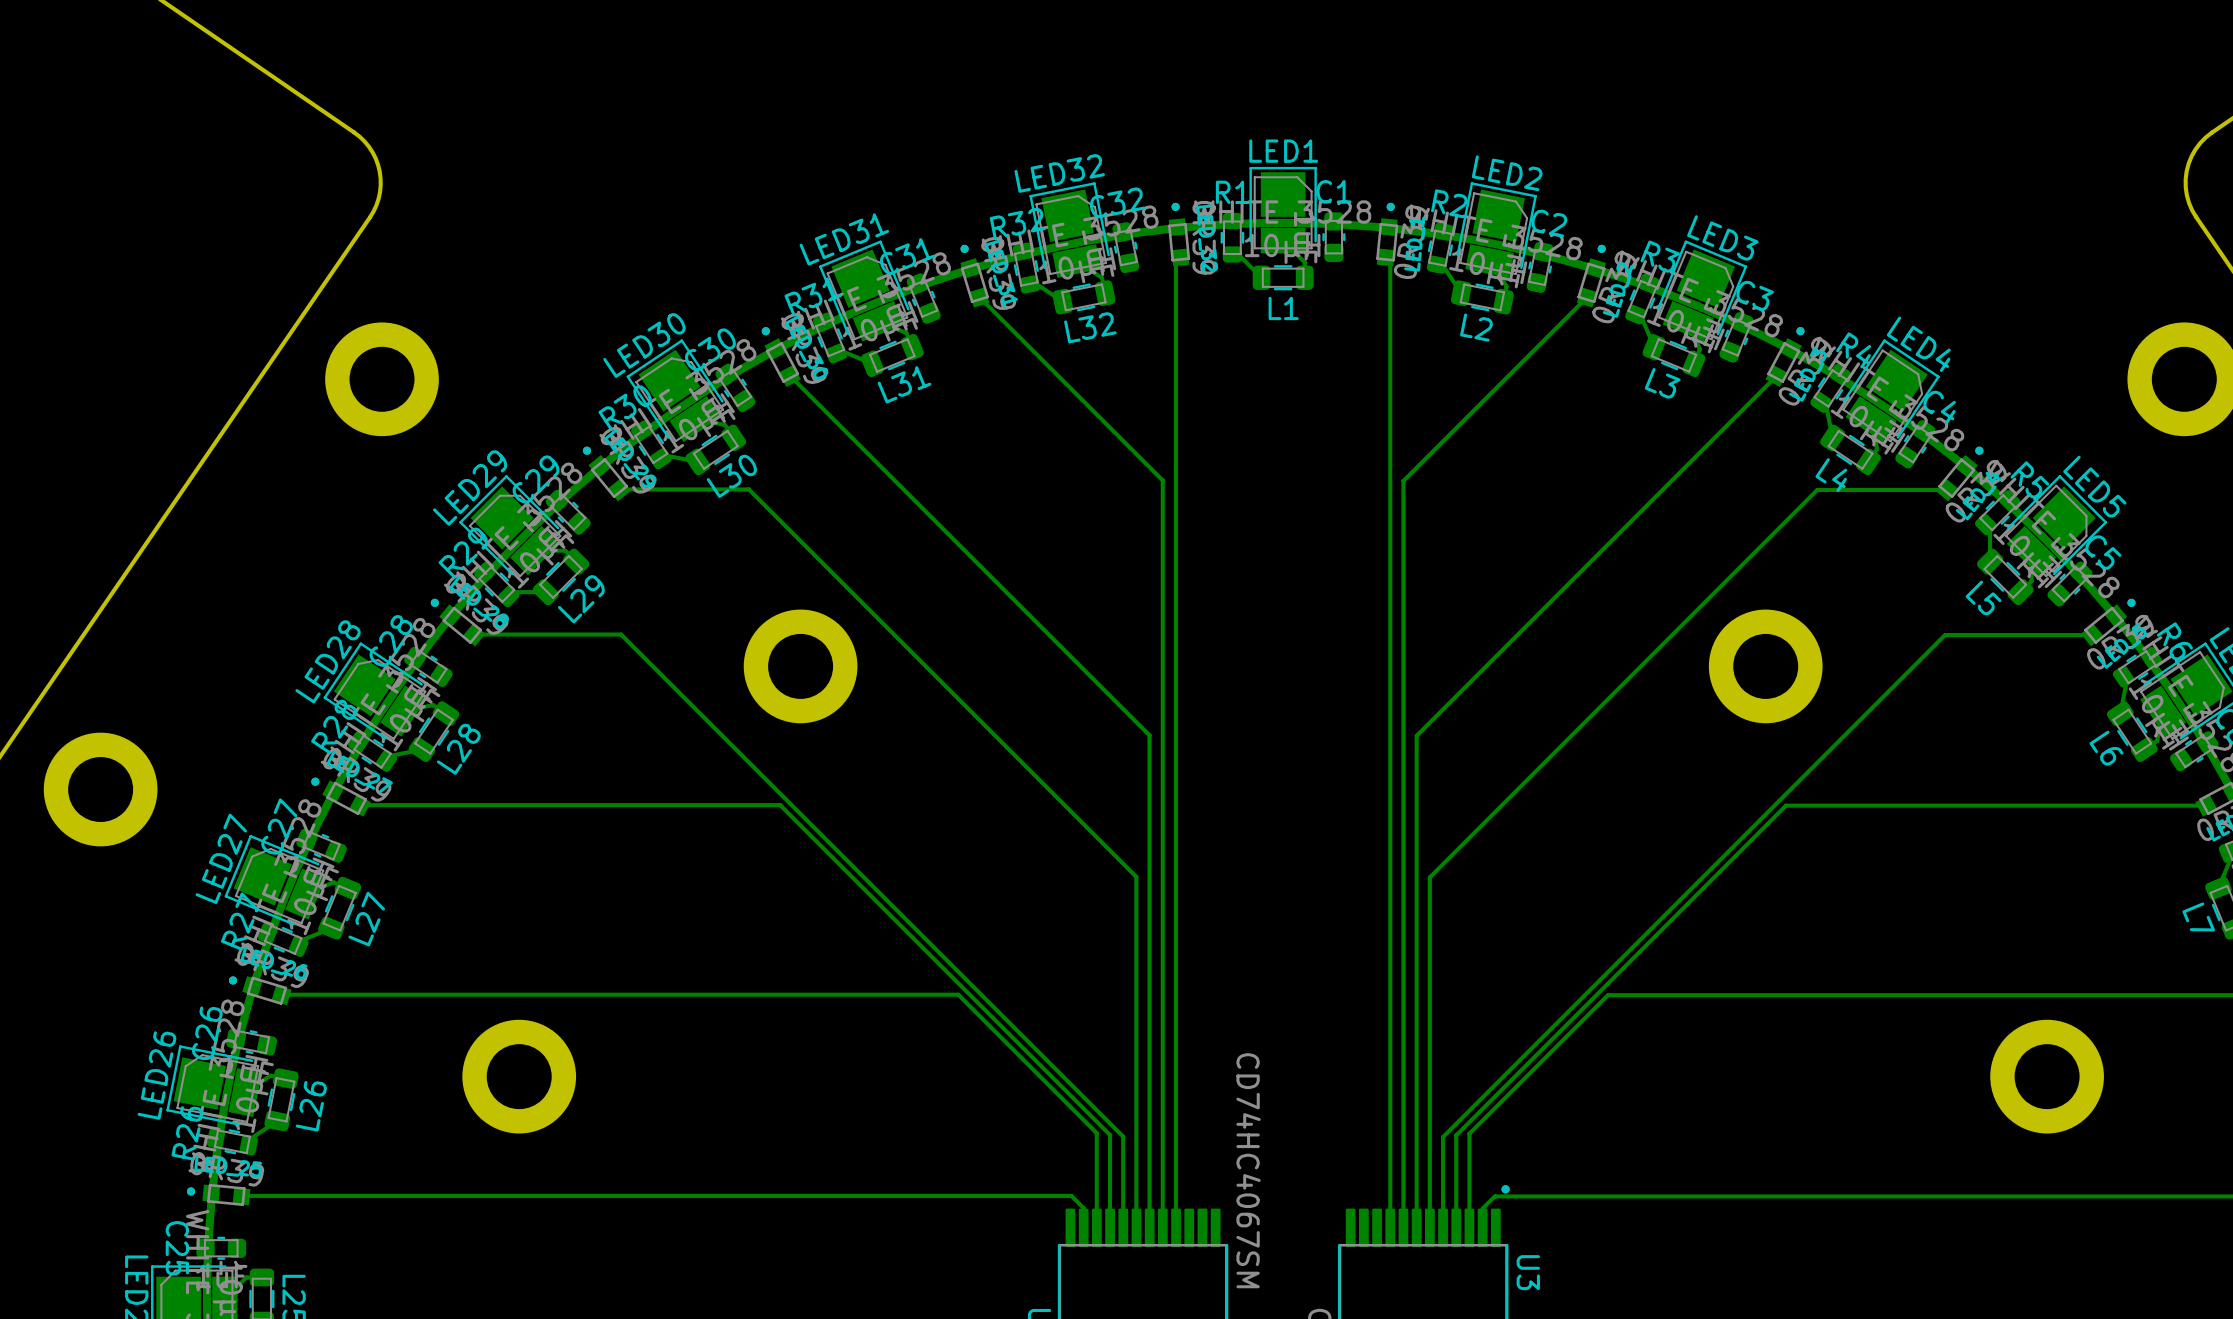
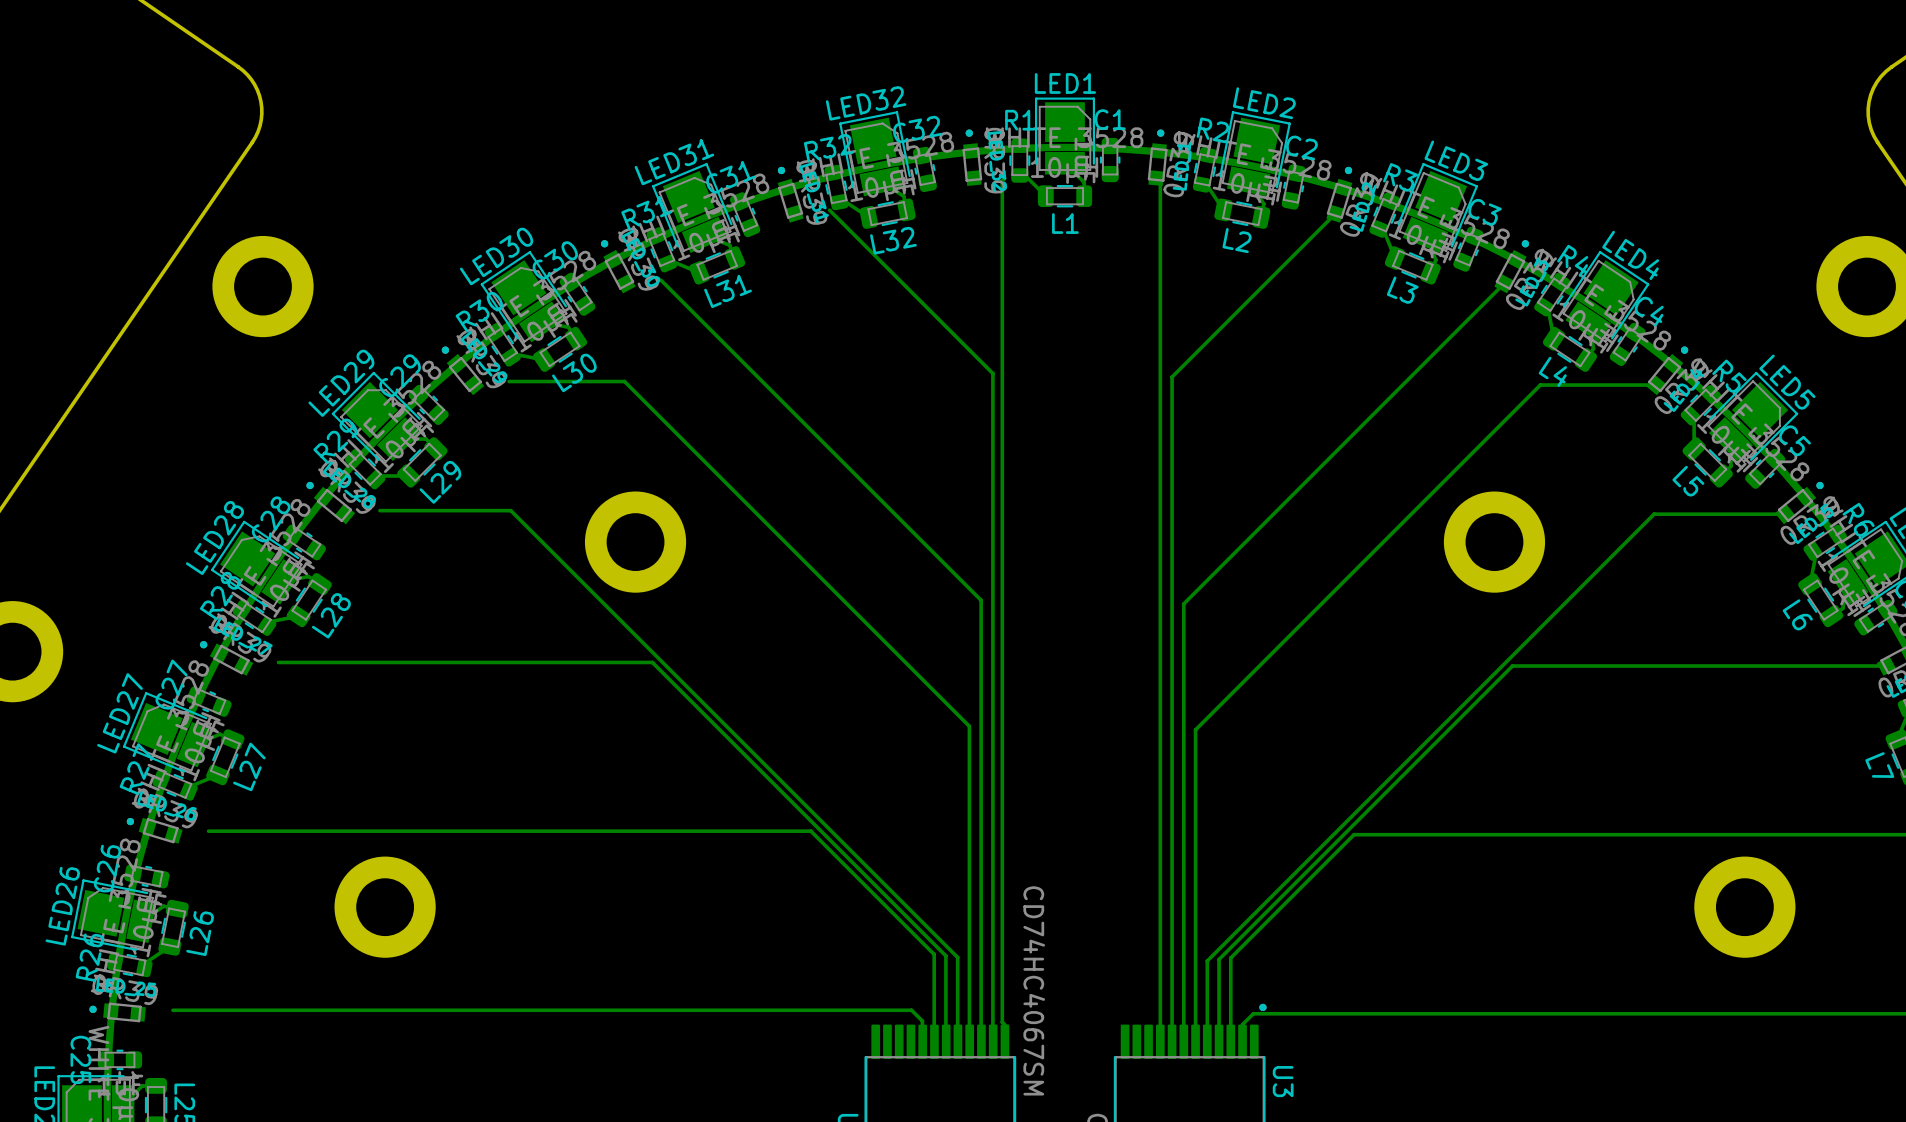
track: none -> (1004, 178) (1002, 180) (1002, 1022) (1004, 1024) (1004, 1038)
track: (1175, 261) (1175, 1227) -> none
track: (979, 296) (1162, 480) (1162, 1227) -> (829, 210) (992, 373) (992, 1038)
track: (789, 375) (1149, 735) (1149, 1227) -> (660, 280) (981, 600) (981, 1038)
track: (619, 489) (748, 489) (1136, 876) (1136, 1227) -> (509, 381) (624, 381) (969, 726) (969, 1038)
track: (473, 634) (621, 634) (1123, 1136) (1123, 1227) -> (379, 510) (510, 510) (957, 957) (957, 1038)
track: (359, 805) (780, 805) (1109, 1134) (1109, 1227) -> (278, 662) (652, 662) (945, 955) (945, 1038)
track: (281, 994) (958, 994) (1096, 1133) (1096, 1227) -> (208, 831) (810, 831) (934, 954) (934, 1038)
track: (241, 1195) (1071, 1195) (1083, 1208) (1083, 1227) -> (172, 1010) (911, 1010) (922, 1021) (922, 1038)

